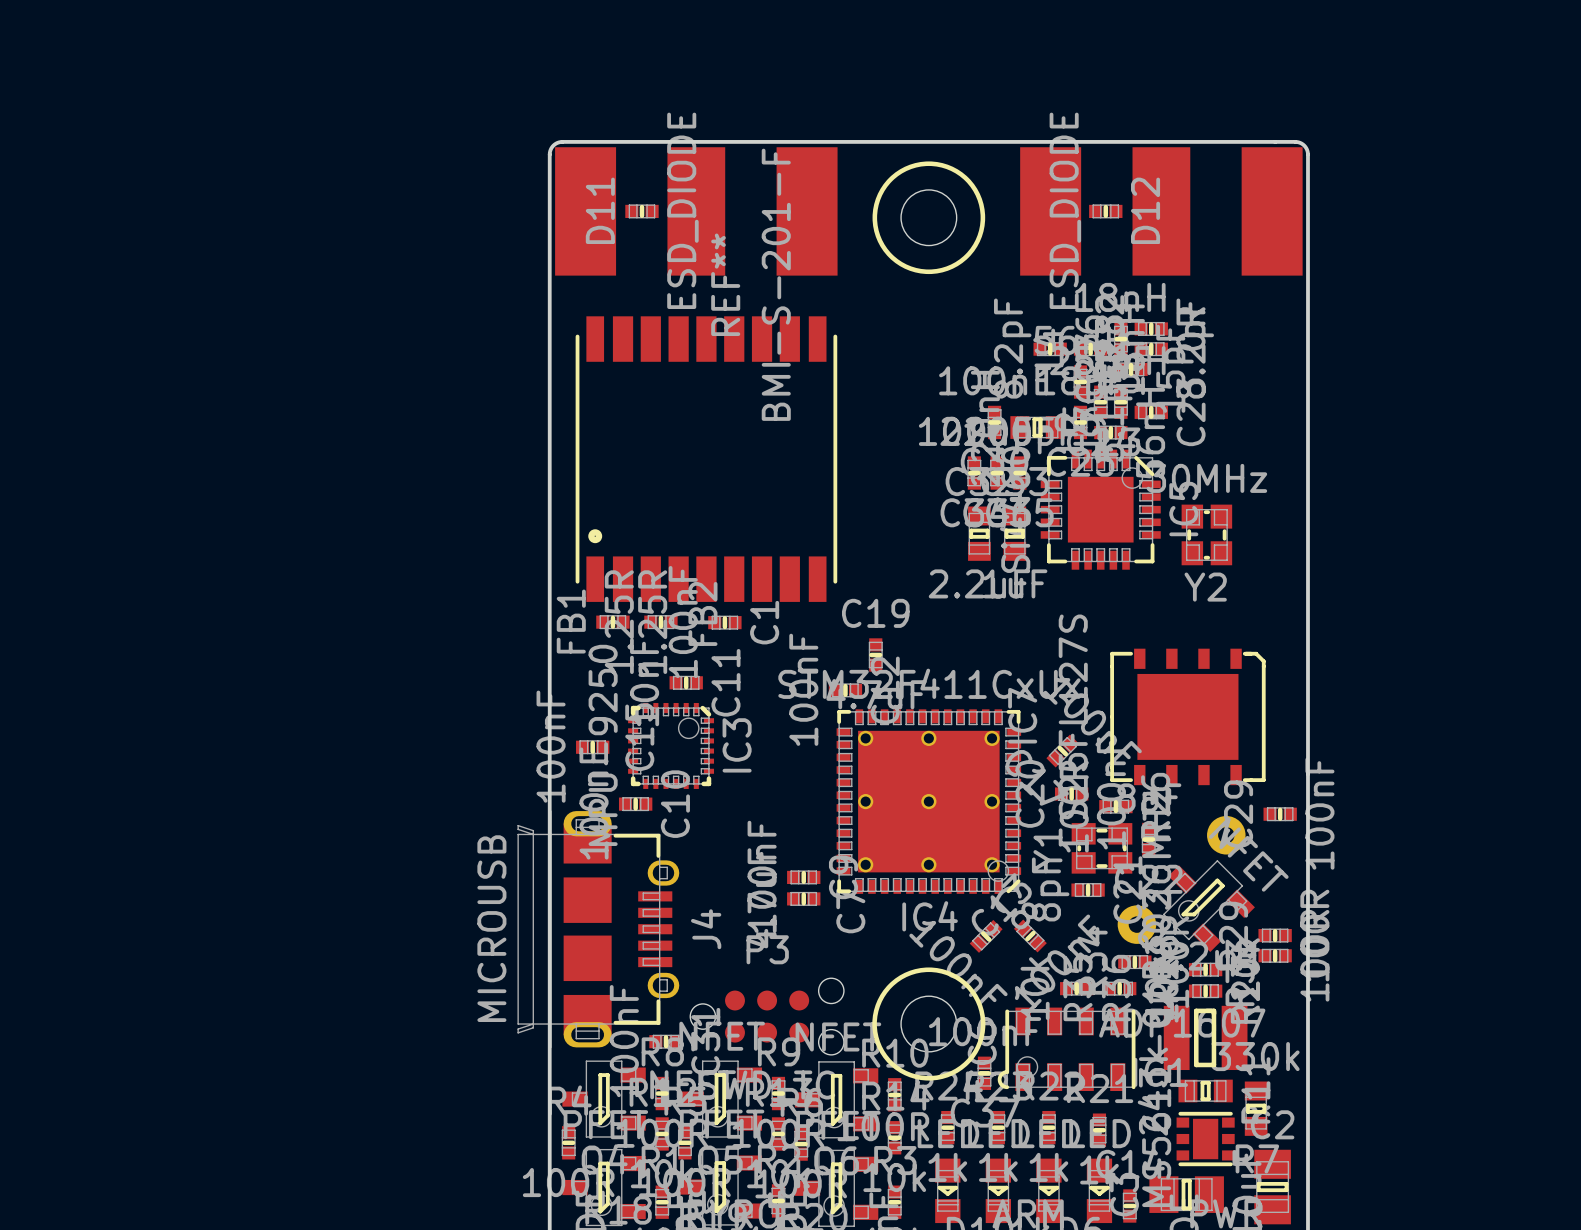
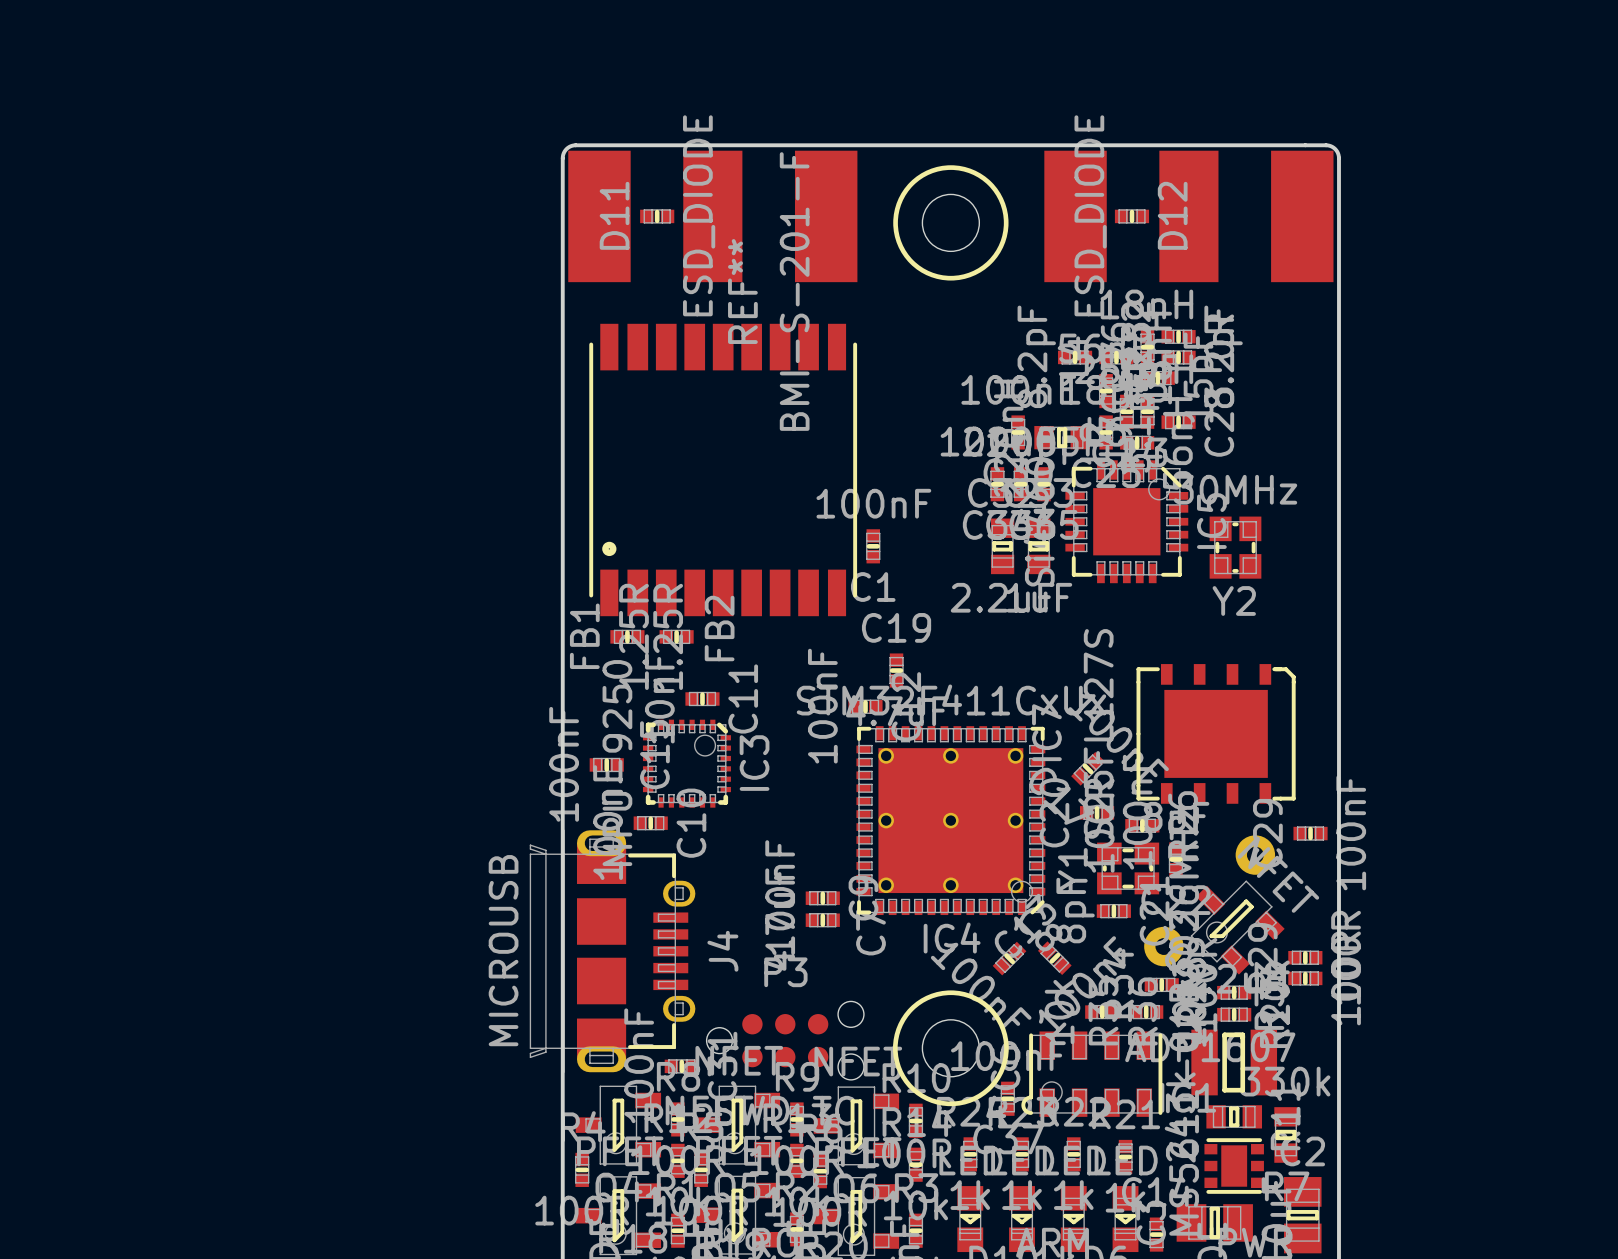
line: none -> (868, 546) (877, 546)
line: (724, 618) (724, 626) -> none
C1 rotation: 0° (724, 622) -> 90° clockwise (873, 546)
C1 position: (724, 622) -> (873, 546)

